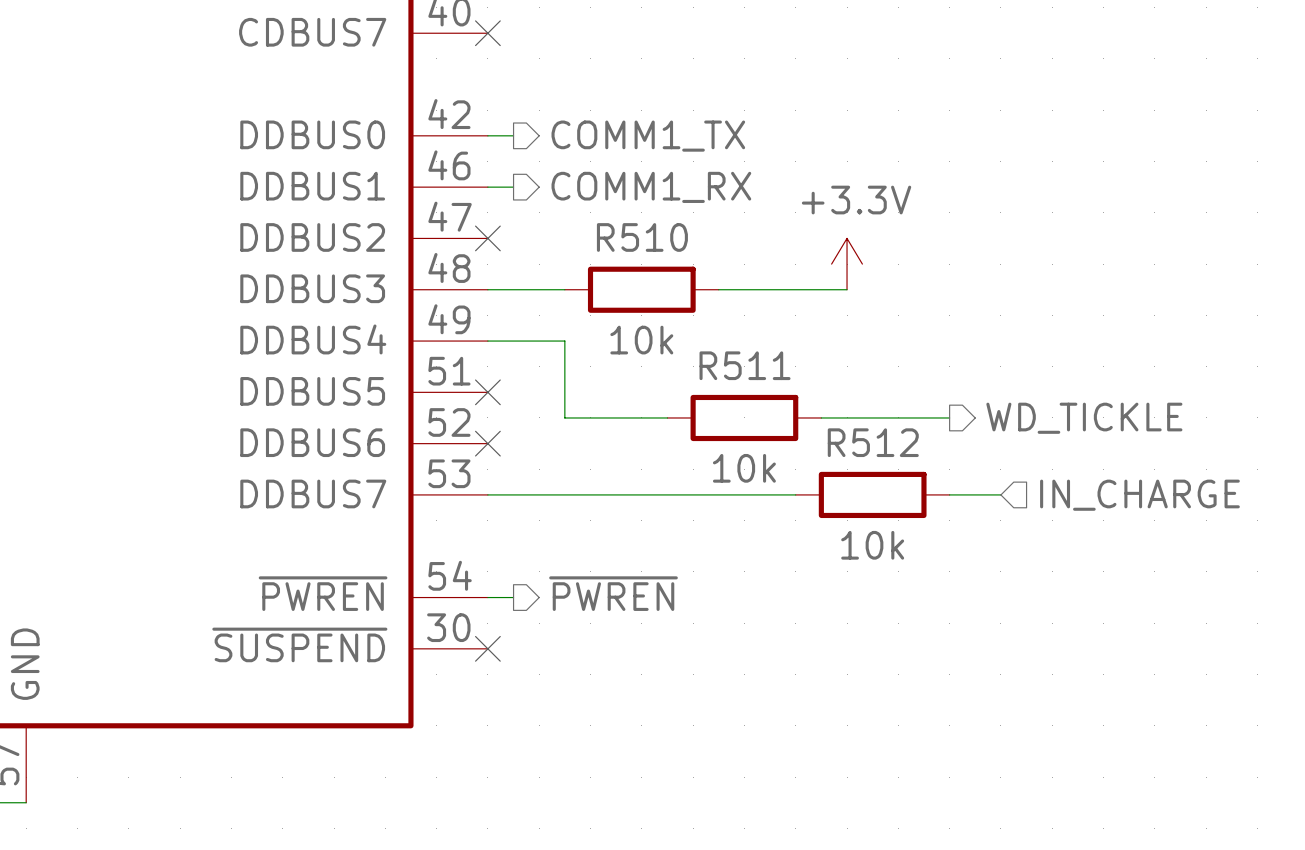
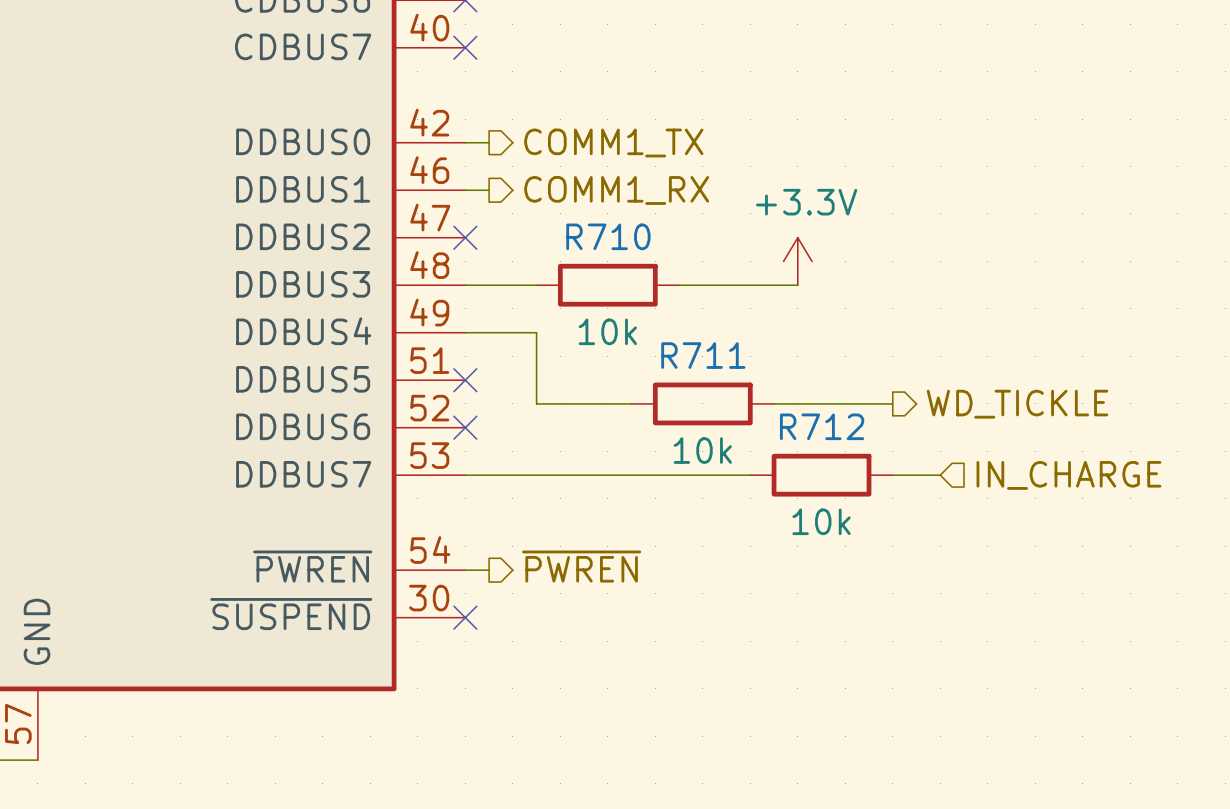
R510 name: R510 (642, 237) -> R710 (608, 236)
R511 name: R511 (745, 365) -> R711 (703, 355)
R512 name: R512 (873, 442) -> R712 (822, 426)

